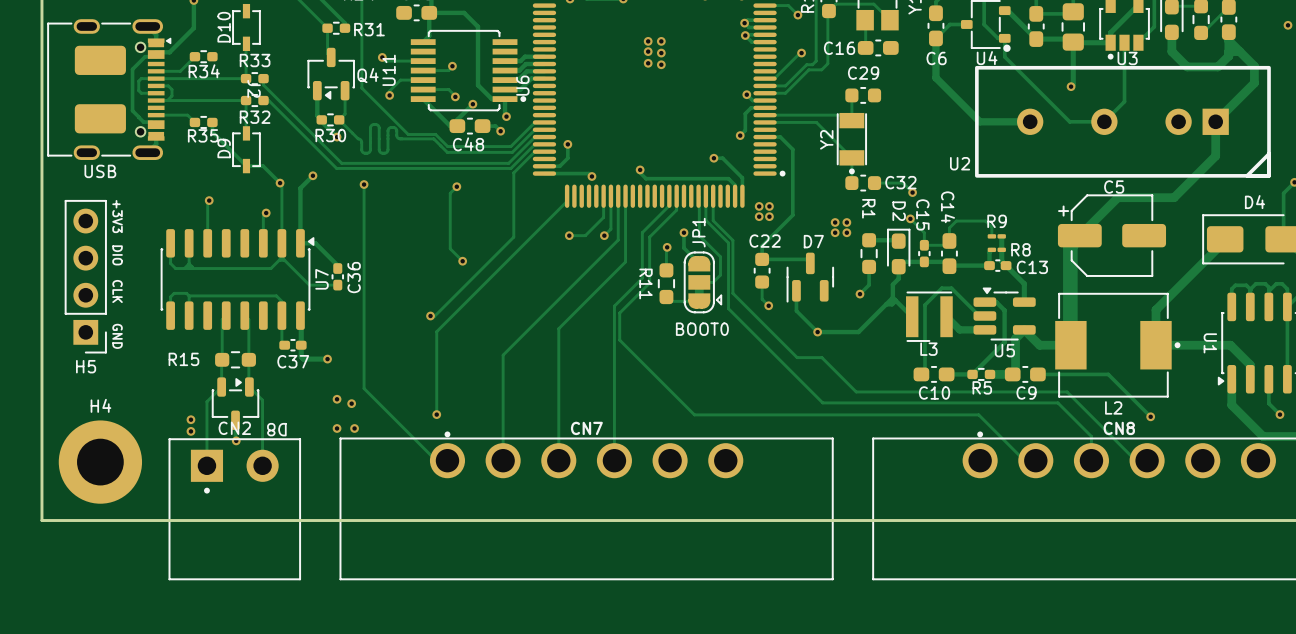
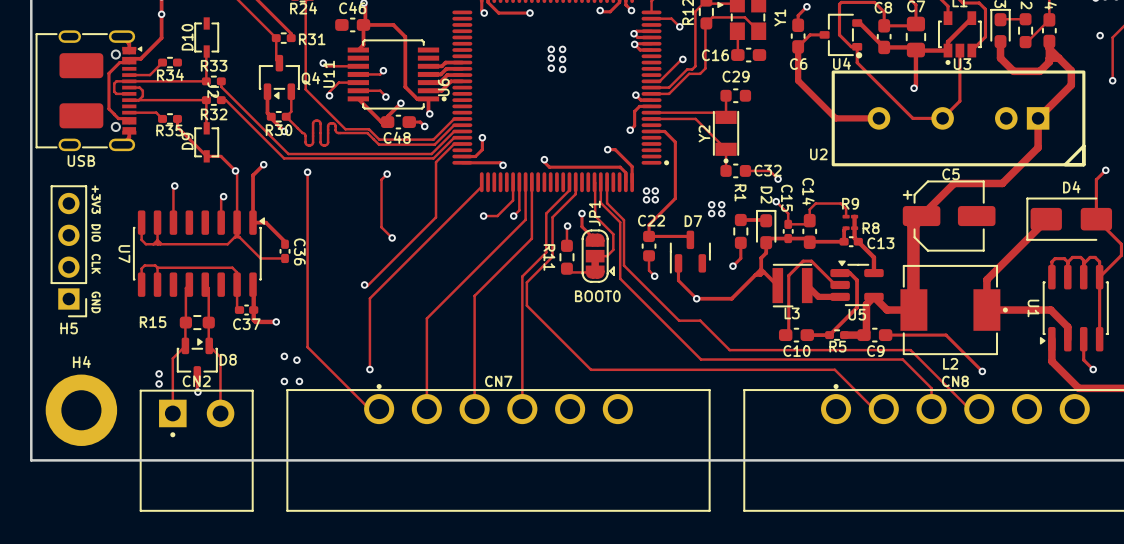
C36 name rotation: 0° (354, 277) -> 180° (299, 251)
U7 name rotation: 0° (322, 279) -> 180° (124, 254)
U7 name position: U7 (322, 279) -> U7 (124, 254)
D8 name rotation: 0° (276, 429) -> 180° (228, 359)

